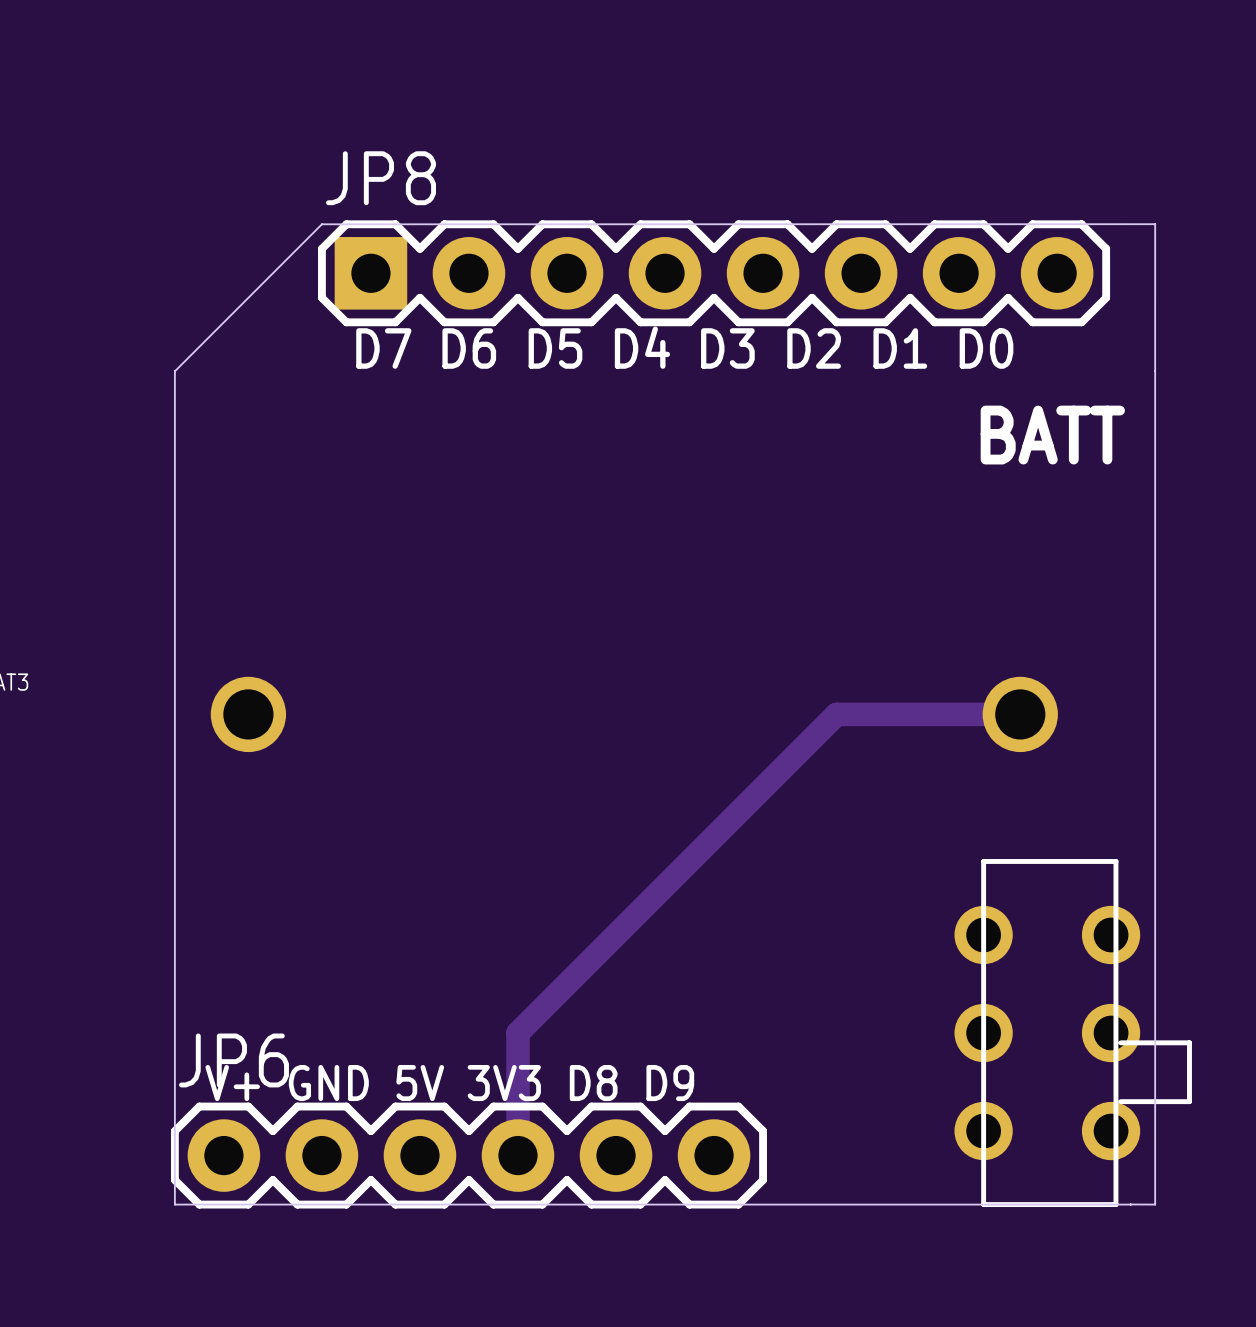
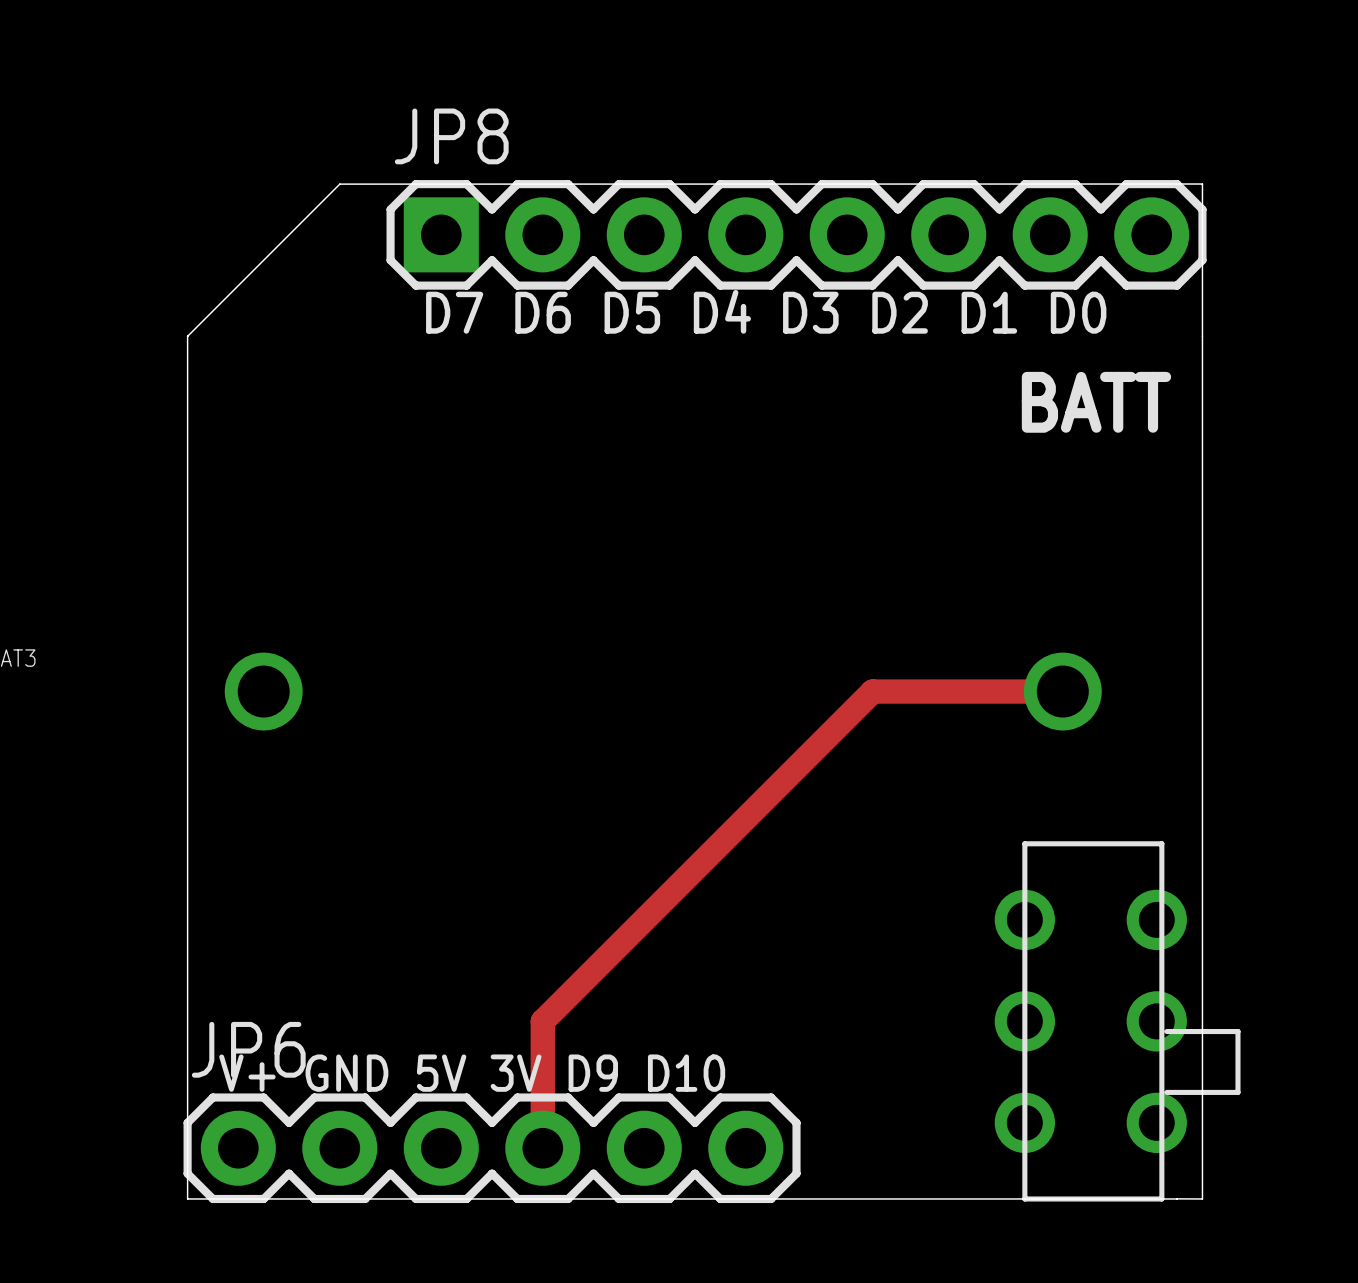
JP8 position: (714, 273) -> (796, 234)
text position: D7 D6 D5 D4 D3 D2 D1 D0 (684, 347) -> D7 D6 D5 D4 D3 D2 D1 D0 (766, 311)
text: V+ GND 5V 3V3 D8 D9 (449, 1083) -> V+ GND 5V 3V D9 D10 (472, 1073)

